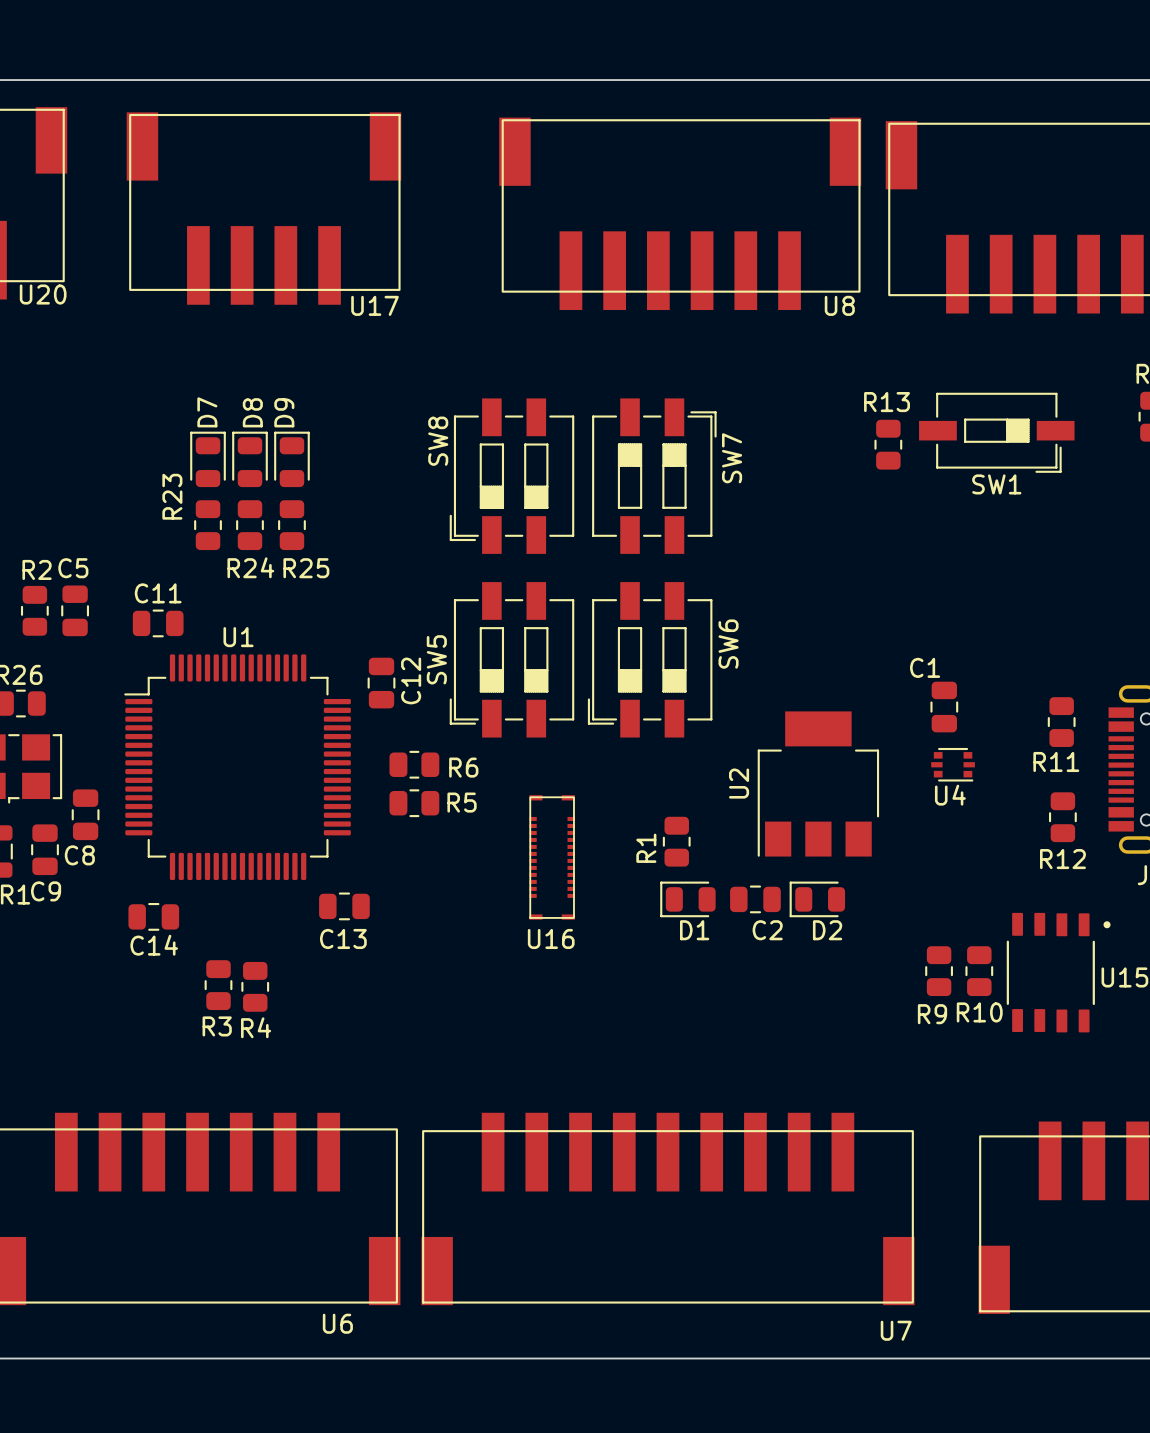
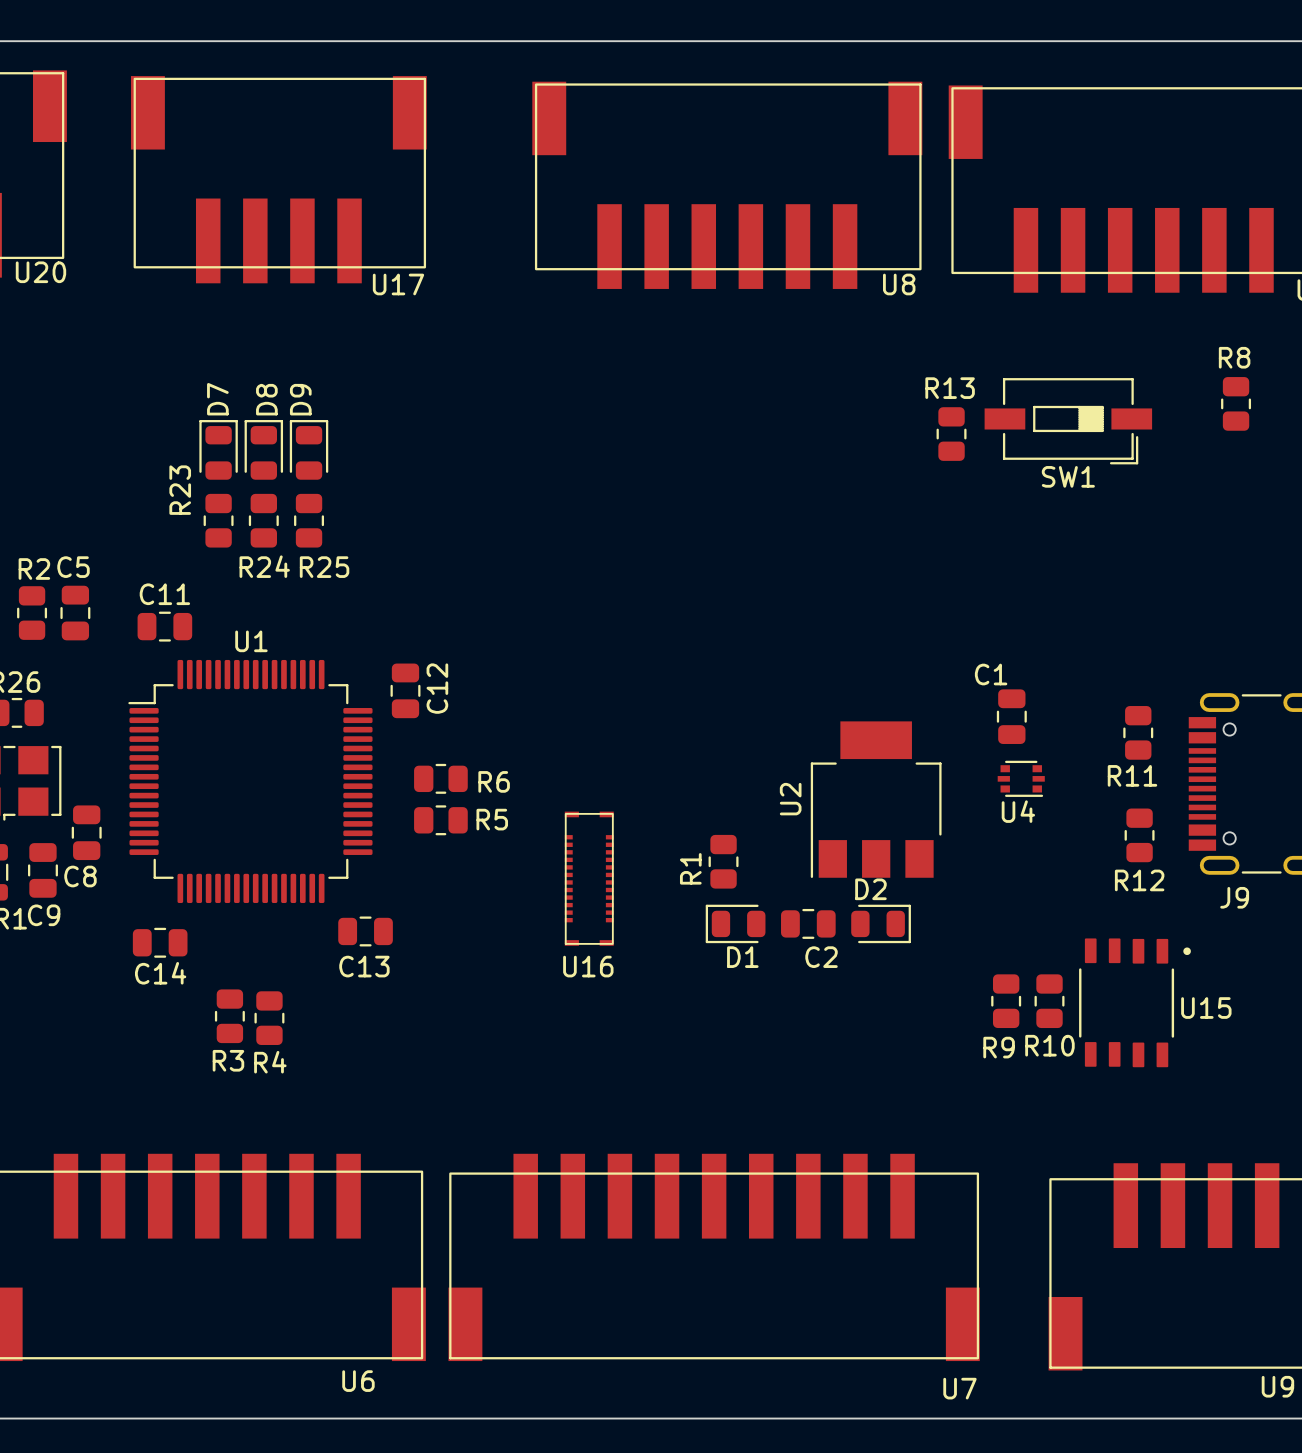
SW8: (511, 476) -> none
SW7: (654, 476) -> none
SW5: (511, 659) -> none
SW6: (650, 659) -> none
D2 rotation: 0° (817, 899) -> 180° (881, 923)

